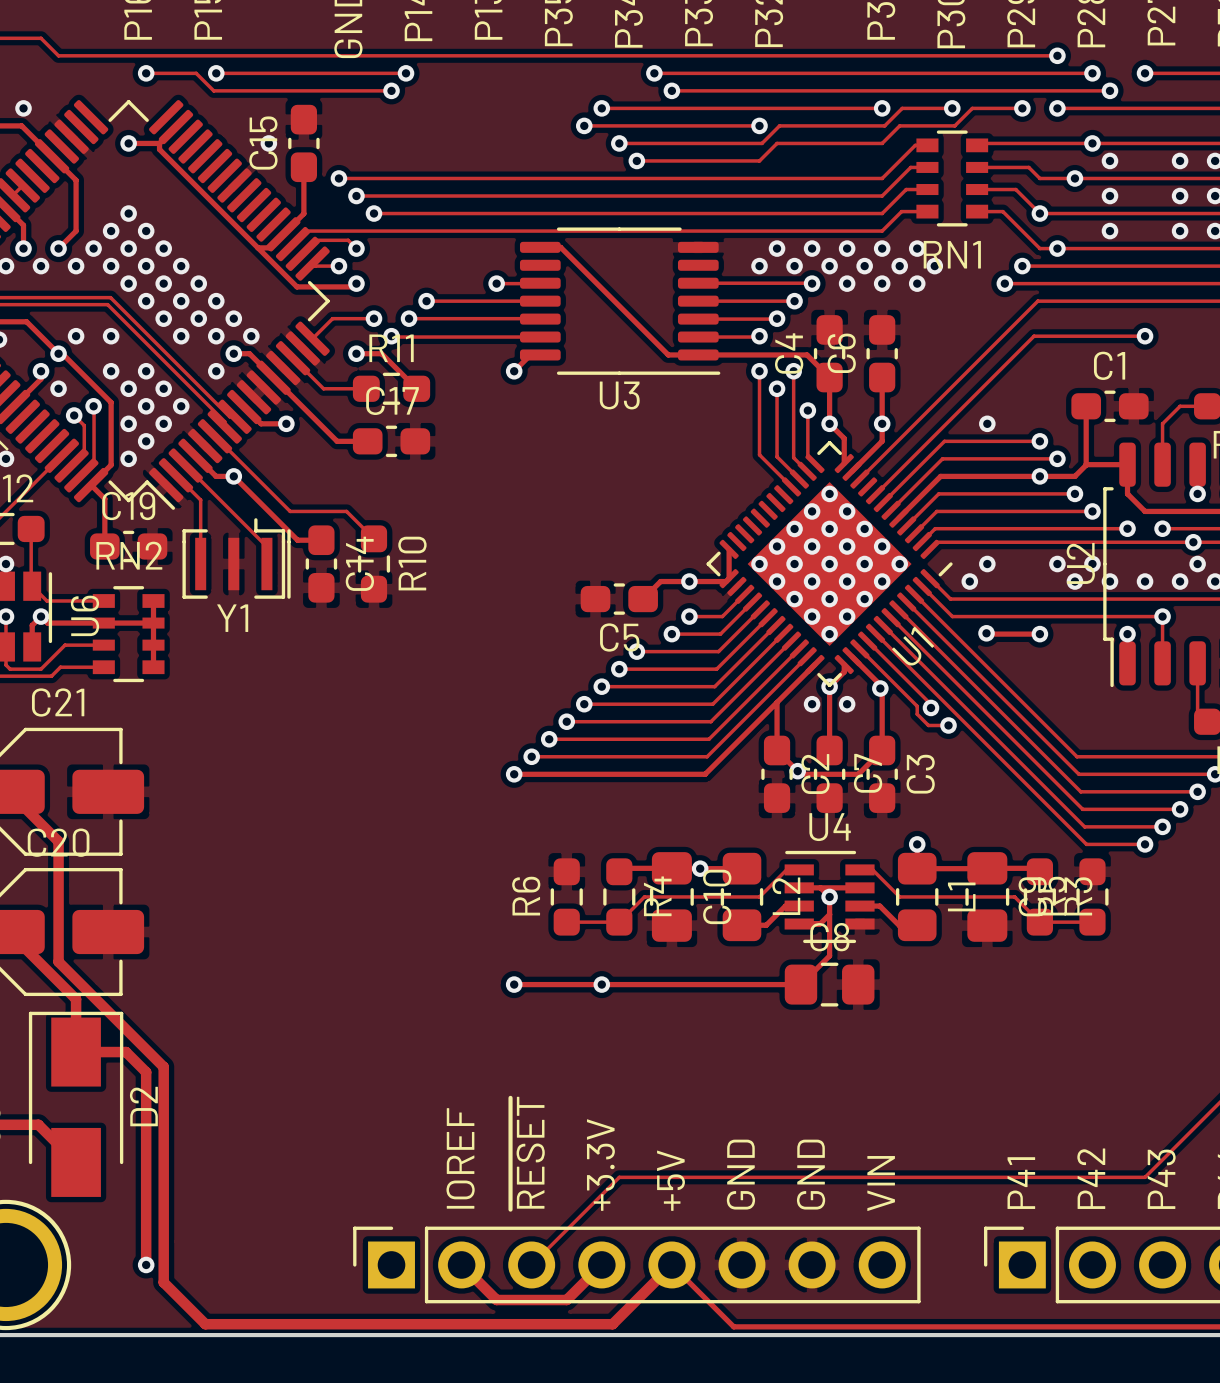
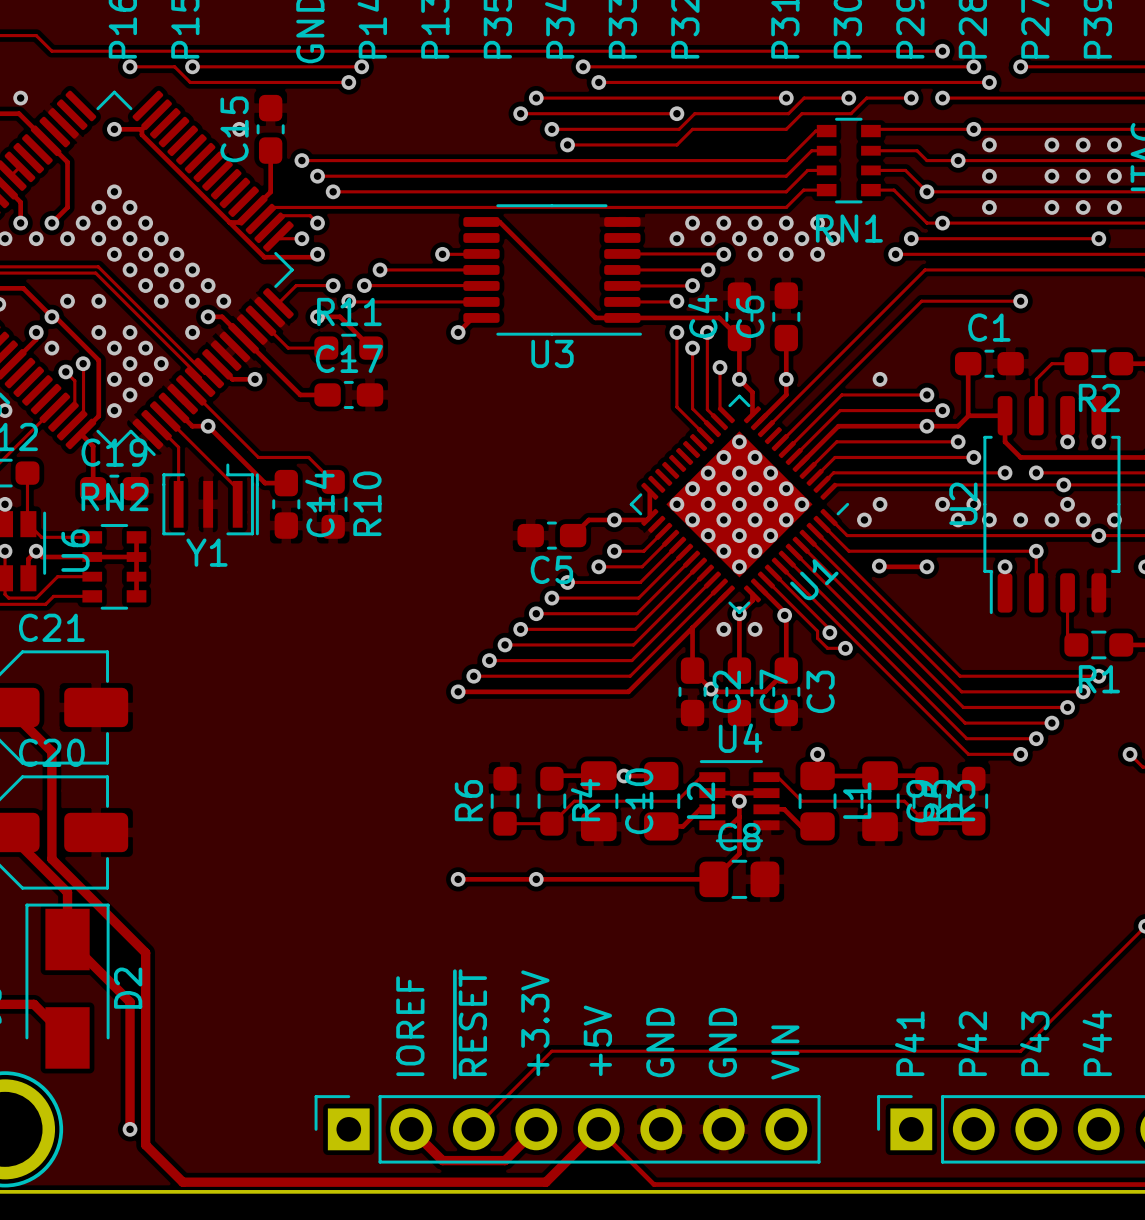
track: (76, 1052) (126, 1052) (146, 1072) (146, 1122) -> (67, 939) (130, 1002)

